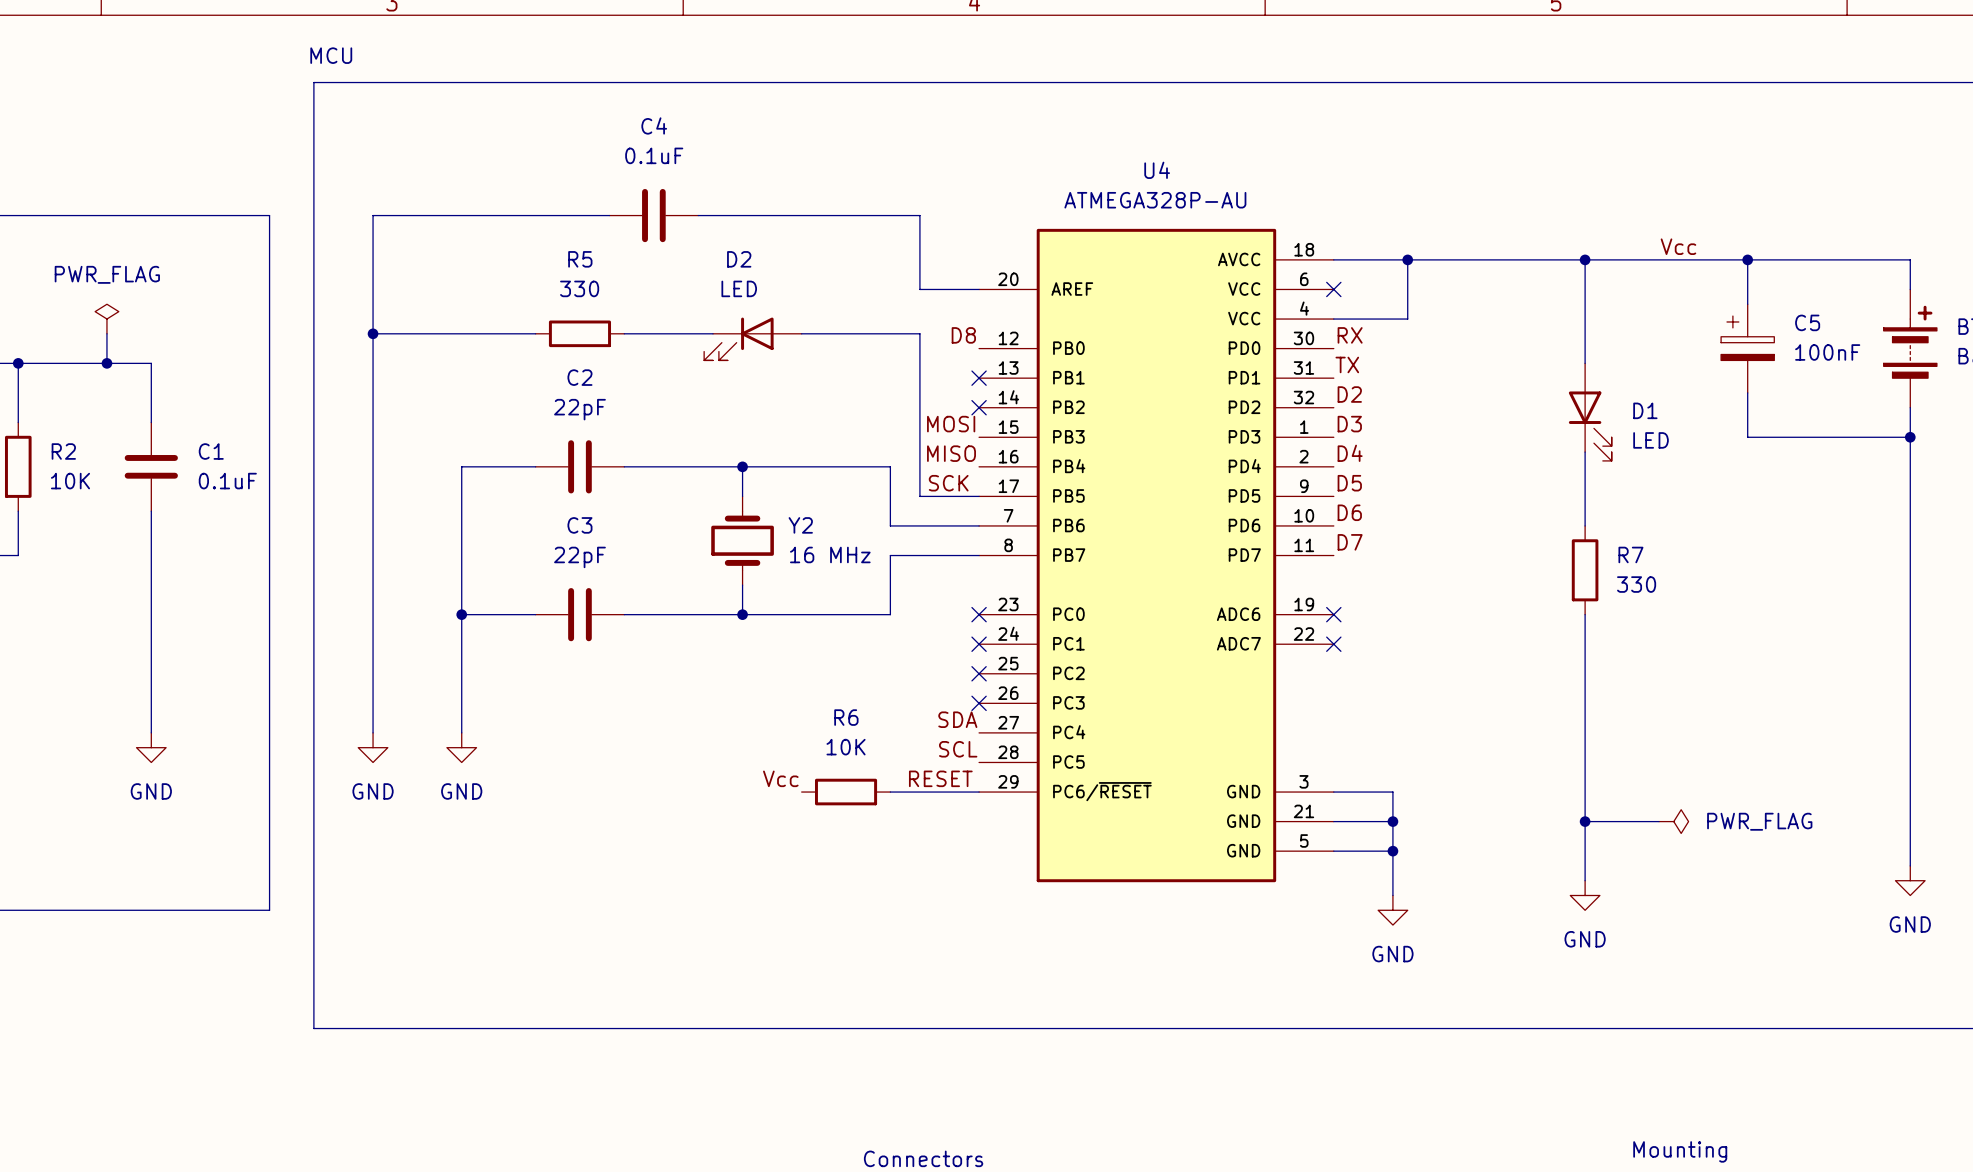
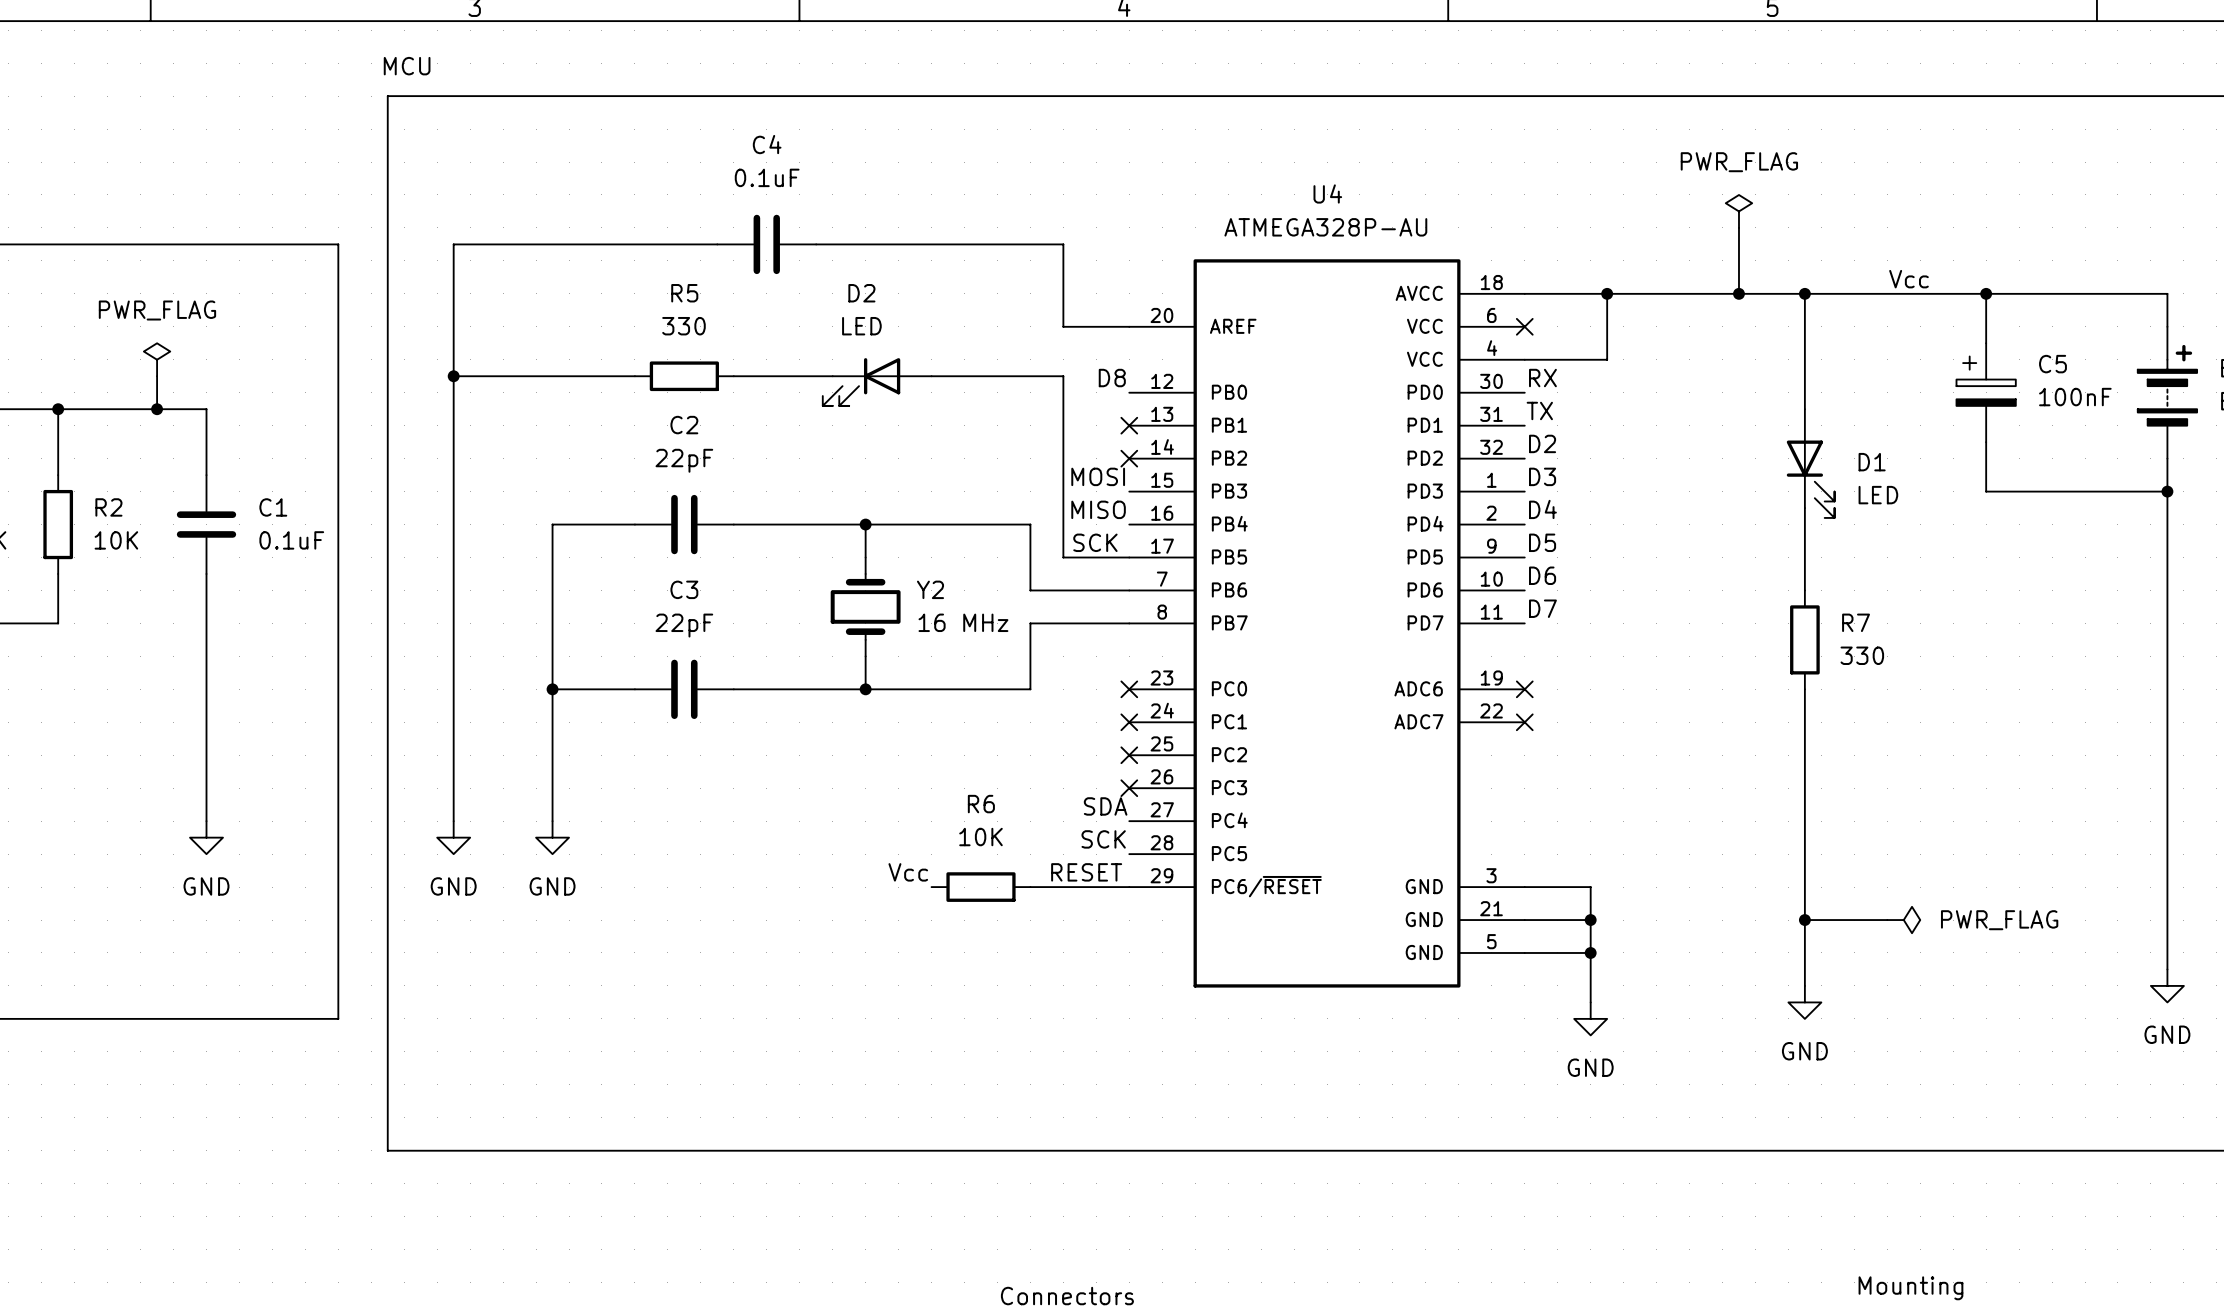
power symbol: none -> PWR_FLAG (1738, 211)
wire: none -> (1738, 227) (1738, 293)
junction: none -> (1738, 293)
label: SCL (958, 749) -> SCK (1103, 839)

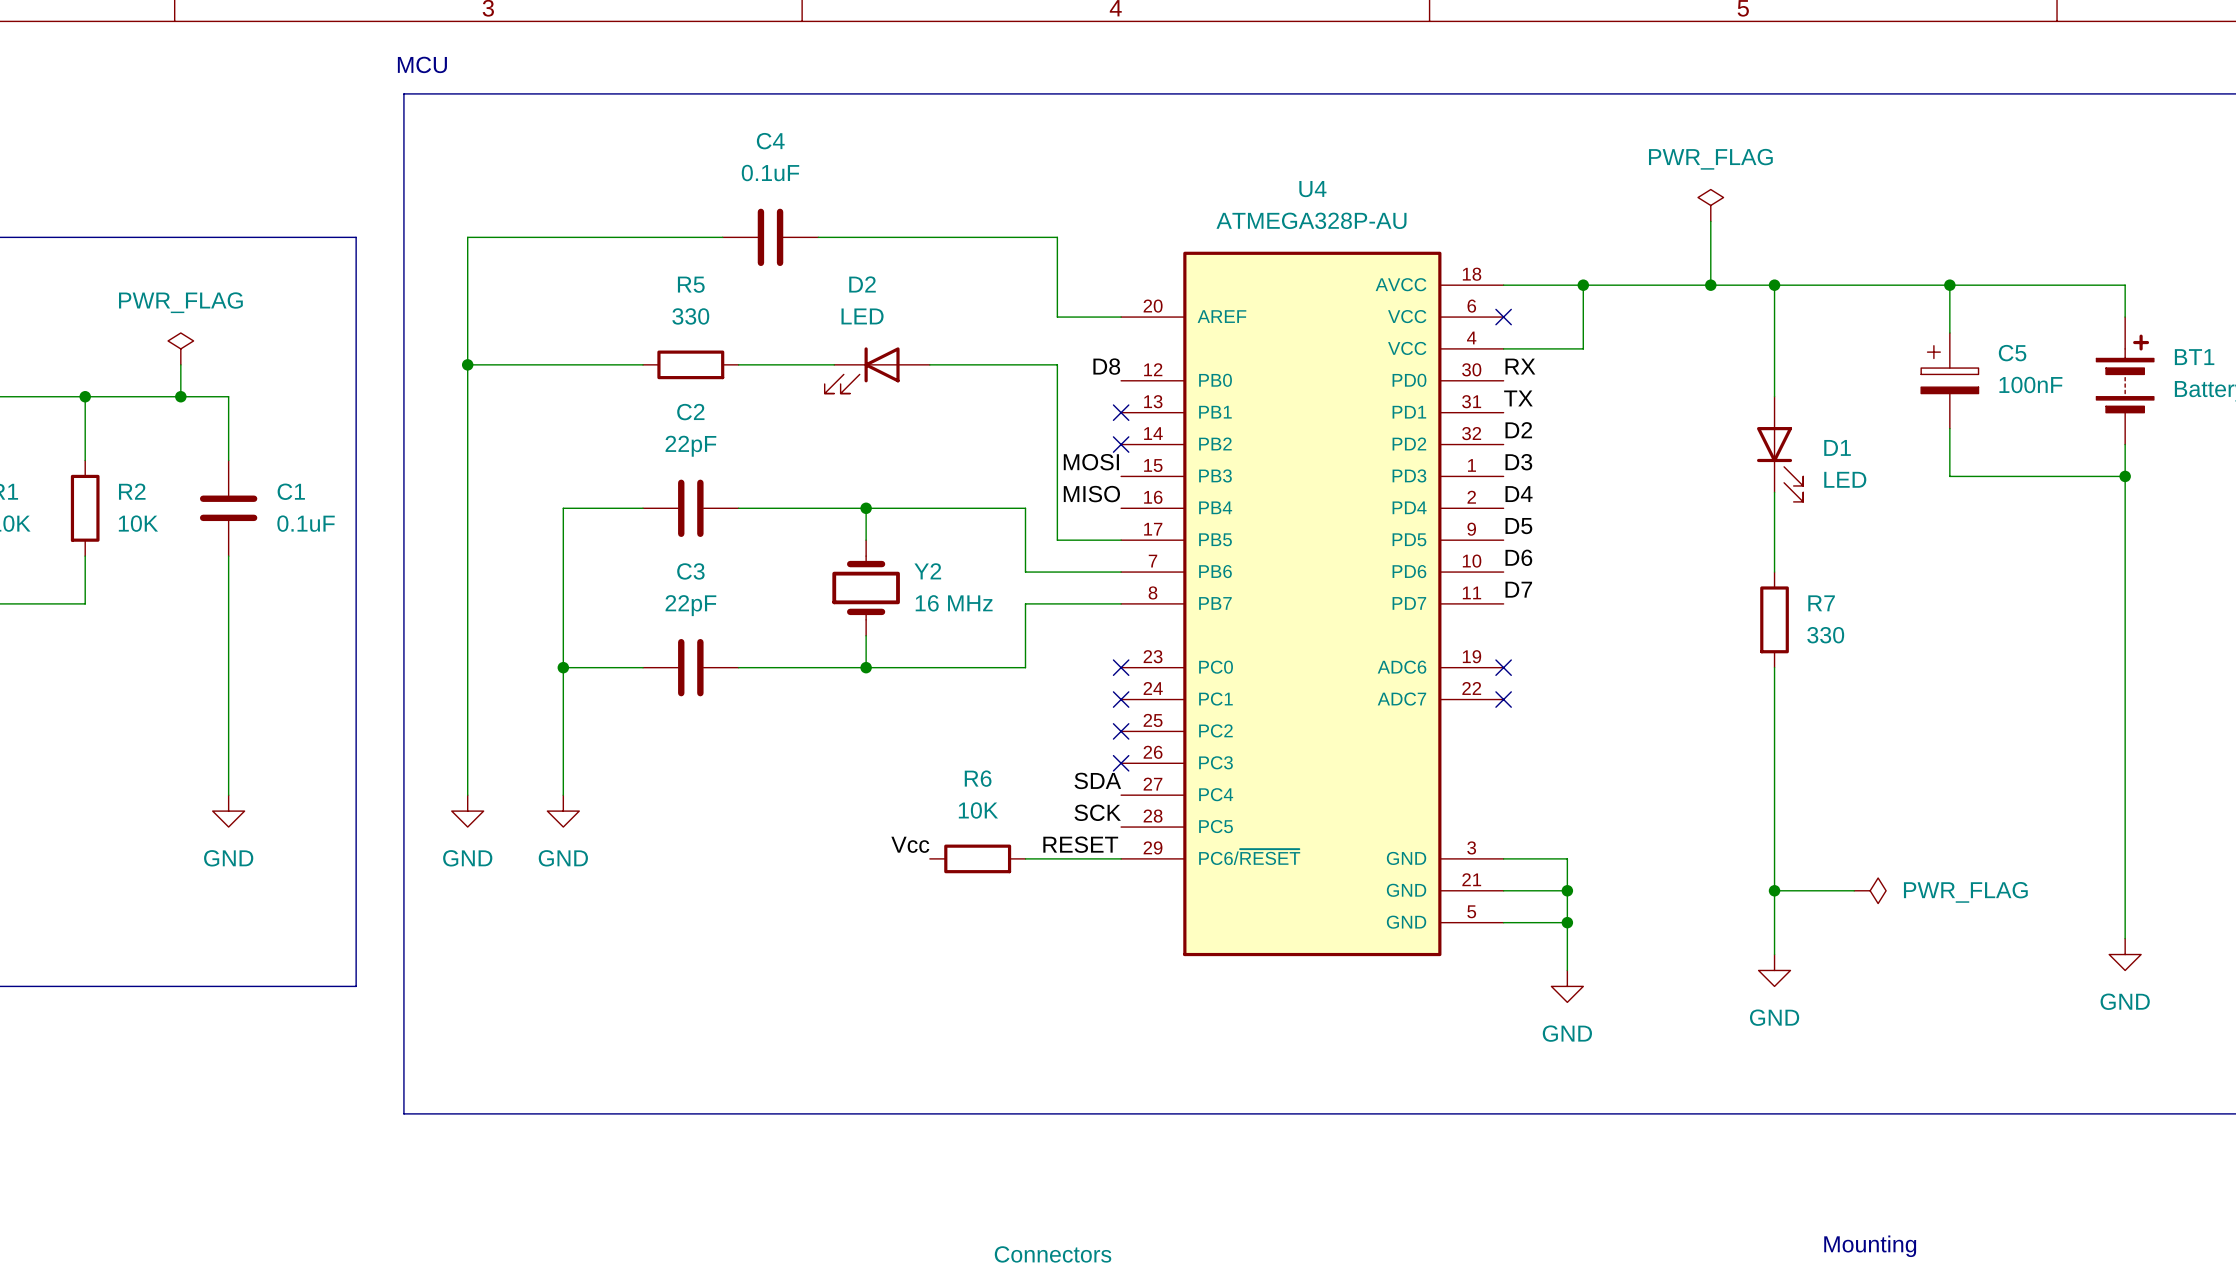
label: Vcc (1908, 279) -> none
label: SCK (1095, 542) -> none

